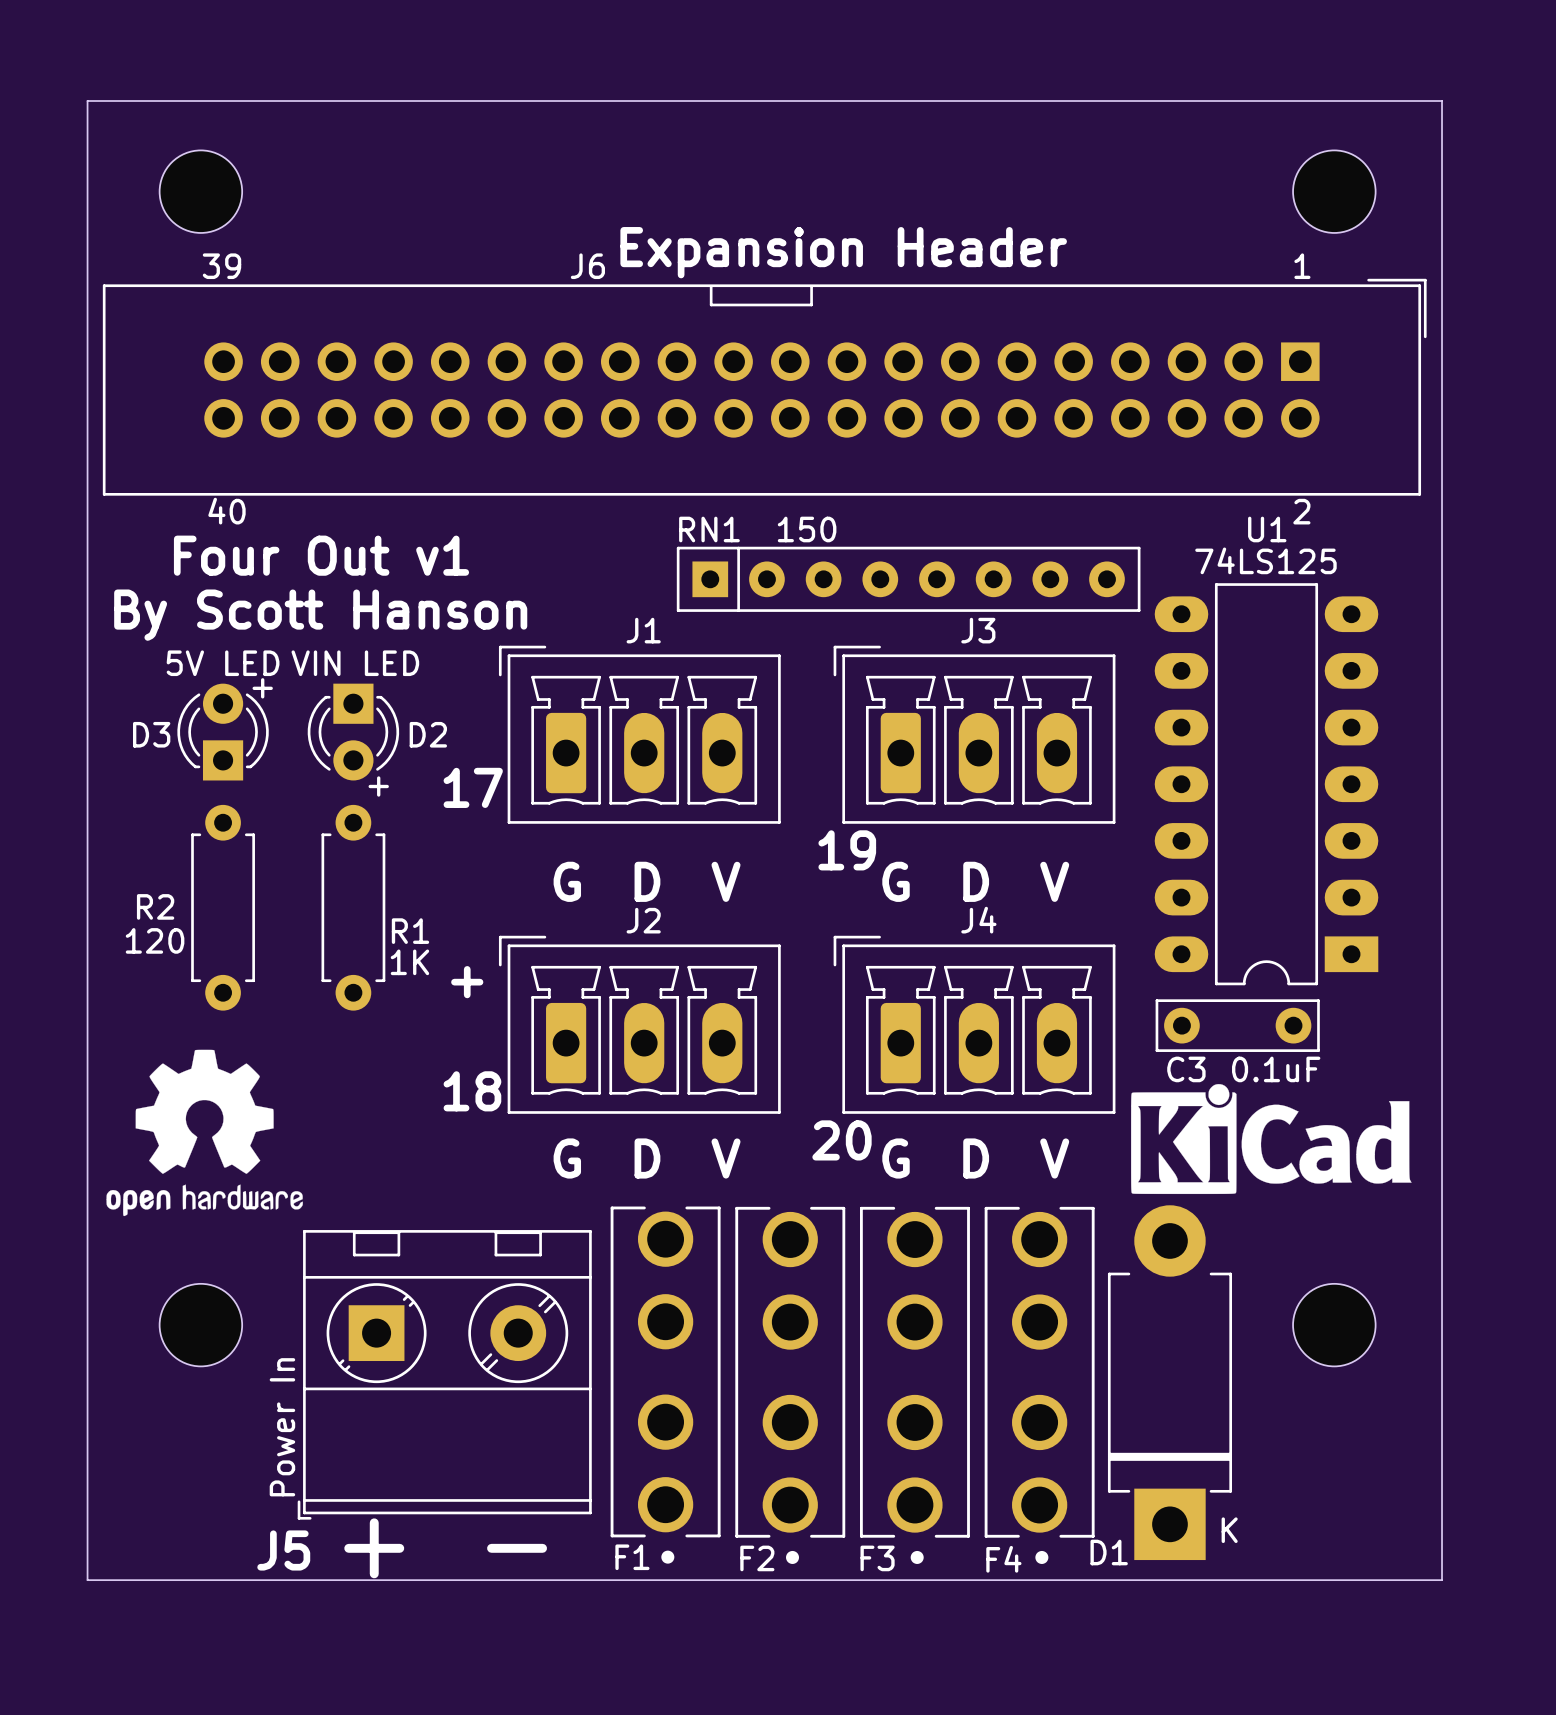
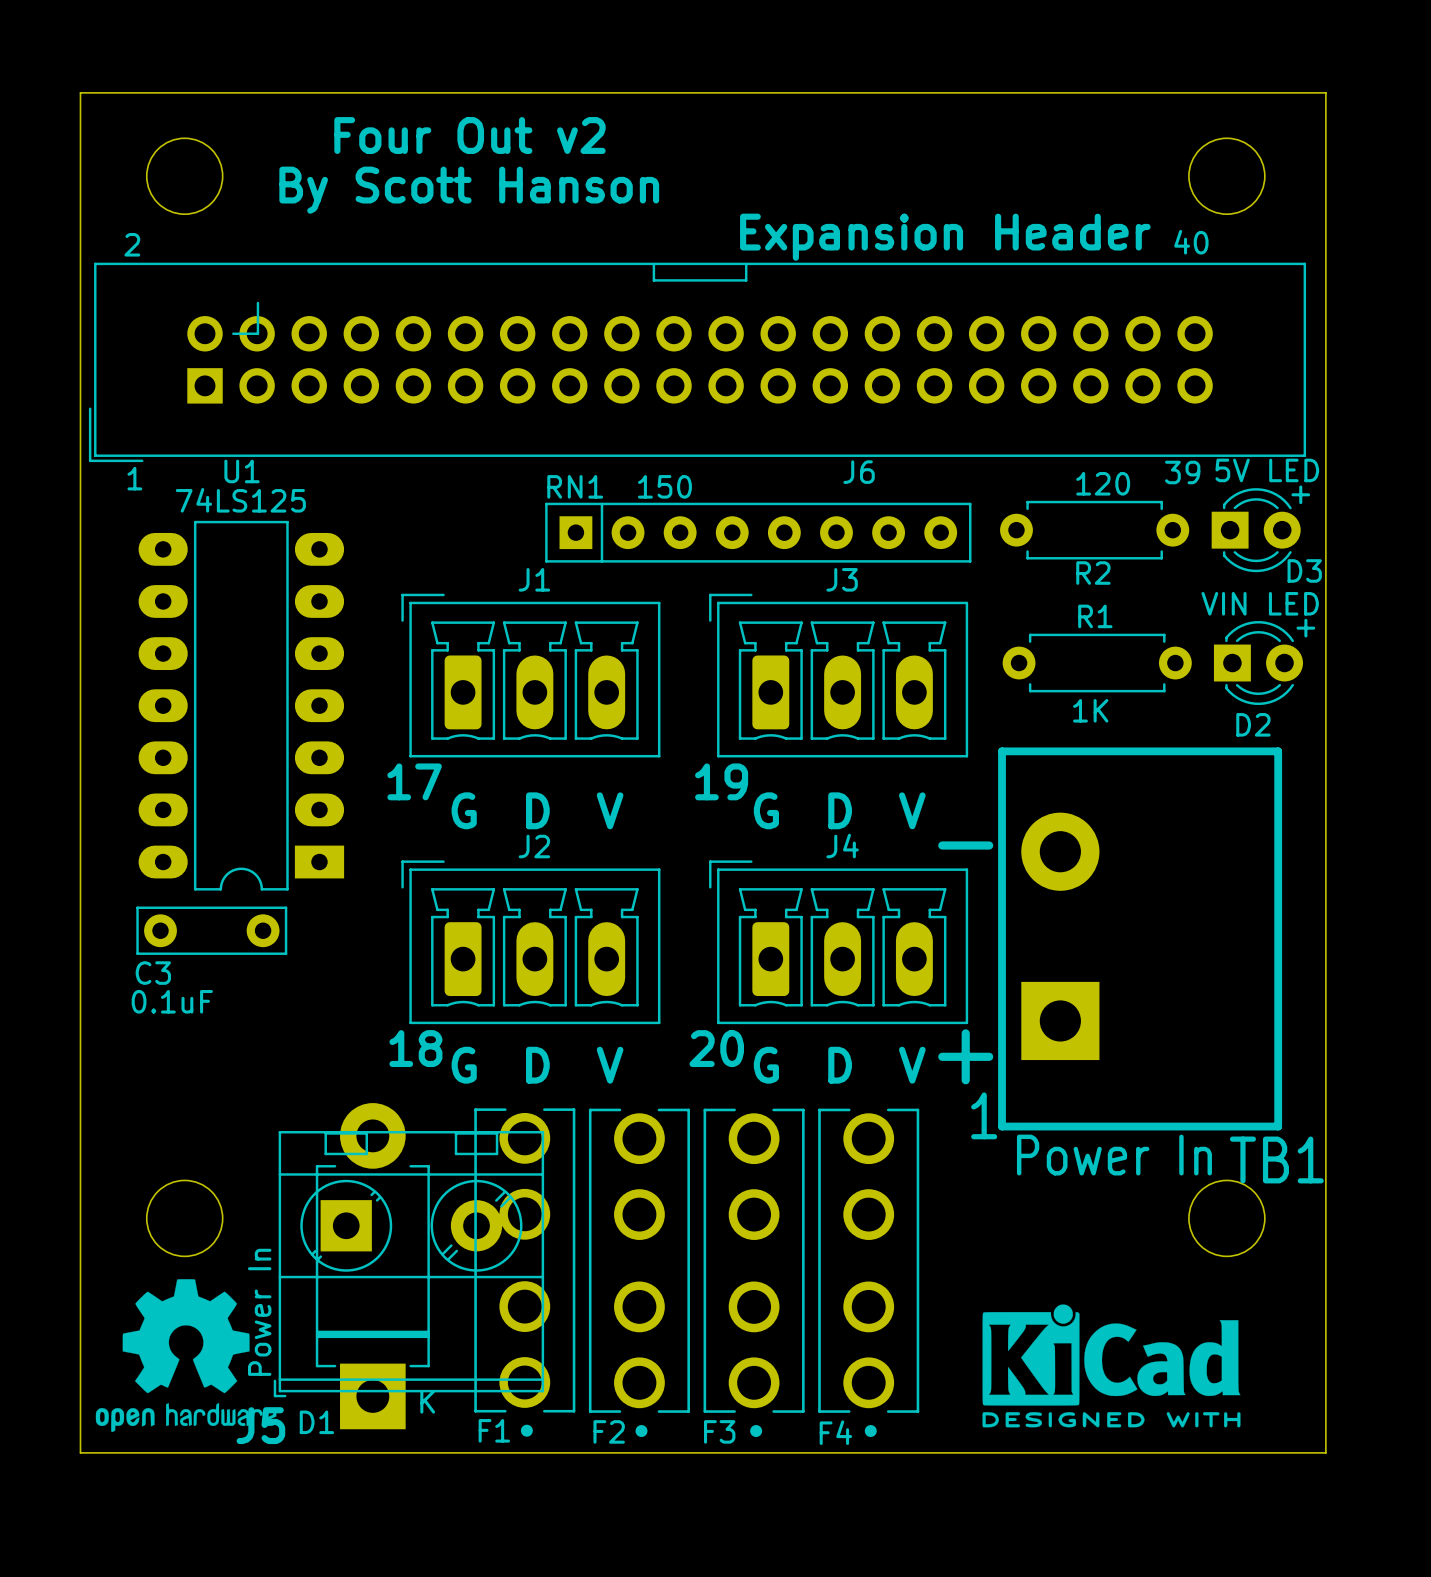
text: none -> Four Out v2 (469, 135)
J6 value position: Expansion Header (843, 252) -> Expansion Header (945, 237)
text: none -> 2 (132, 244)
text: 39 (222, 266) -> none
text: 1 (1302, 266) -> 40 (1191, 242)
line: none -> (257, 302) (257, 333) (233, 333)
J6 rotation: 0° (764, 387) -> 180° (697, 362)
text: 40 (226, 511) -> none
text: 2 (1301, 511) -> 39 (1182, 472)
text: none -> 1 (134, 478)
text: none -> + (1300, 494)
text: Four Out v1 (321, 555) -> none
RN1 position: (908, 579) -> (758, 532)
text position: By Scott Hanson (320, 615) -> By Scott Hanson (469, 190)
text: none -> + (1305, 628)
text: + (262, 688) -> none
D3 rotation: 0° (223, 732) -> 90° clockwise (1256, 530)
D3 position: (223, 732) -> (1256, 530)
D2 rotation: 0° (353, 732) -> 90° counterclockwise (1258, 663)
D2 position: (353, 732) -> (1258, 663)
D3 name position: D3 (151, 734) -> D3 (1304, 570)
D2 name position: D2 (428, 734) -> D2 (1253, 724)
J1 position: (639, 734) -> (530, 675)
J3 position: (974, 734) -> (838, 675)
U1 position: (1266, 784) -> (241, 705)
text: + (378, 786) -> none
text position: 17 (473, 787) -> 17 (414, 781)
text position: 19 (847, 850) -> 19 (721, 781)
text position: G (567, 881) -> G (464, 810)
text position: D (647, 881) -> D (537, 810)
text position: V (726, 881) -> V (610, 810)
text position: G (896, 881) -> G (766, 810)
text position: D (976, 881) -> D (840, 810)
text position: V (1054, 881) -> V (912, 810)
R2 name position: R2 (155, 906) -> R2 (1093, 573)
R2 rotation: 0° (223, 907) -> 90° clockwise (1094, 530)
R2 position: (223, 907) -> (1094, 530)
R1 rotation: 0° (353, 907) -> 90° clockwise (1097, 663)
R1 position: (353, 907) -> (1097, 663)
text: none -> - (965, 845)
R1 name position: R1 (410, 931) -> R1 (1095, 616)
R2 value position: 120 (155, 940) -> 120 (1103, 483)
R1 value position: 1K (409, 962) -> 1K (1090, 710)
text: + (467, 982) -> none
TB1: none -> Power In (1140, 938)
J2 position: (639, 1024) -> (530, 942)
J4 position: (974, 1024) -> (838, 942)
C3 position: (1237, 1025) -> (211, 930)
C3 name position: C3 (1186, 1069) -> C3 (153, 973)
C3 value position: 0.1uF (1276, 1069) -> 0.1uF (172, 1001)
drawing: [1131, 1084, 1412, 1195] -> none
text position: 18 (472, 1091) -> 18 (415, 1048)
drawing position: (204, 1132) -> (186, 1355)
text position: 20 (842, 1140) -> 20 (716, 1048)
text: none -> + (965, 1056)
text position: G (567, 1158) -> G (464, 1065)
text position: D (647, 1158) -> D (537, 1065)
text position: V (726, 1158) -> V (610, 1065)
text position: G (896, 1158) -> G (766, 1065)
text position: D (976, 1158) -> D (840, 1065)
text position: V (1054, 1158) -> V (912, 1065)
D1 position: (1169, 1382) -> (372, 1266)
F1 position: (665, 1385) -> (524, 1272)
F2 position: (790, 1385) -> (639, 1272)
F3 position: (914, 1385) -> (754, 1272)
F4 position: (1039, 1385) -> (868, 1272)
drawing: none -> [982, 1304, 1241, 1428]
text: + (374, 1548) -> none
text: - (517, 1548) -> none

